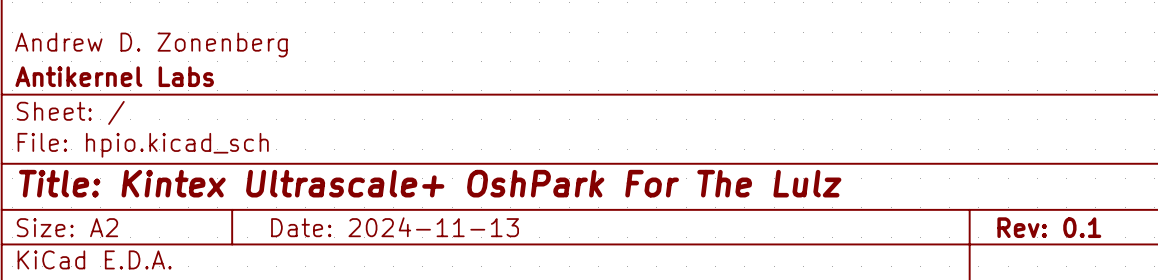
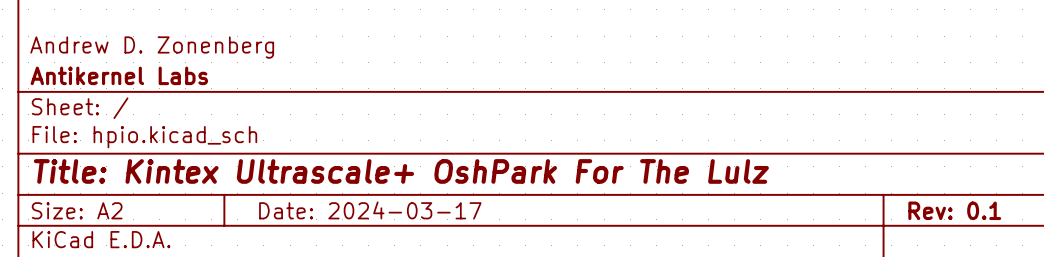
title block: Date: 2024-11-13 (395, 227) -> Date: 2024-03-17 (370, 210)

